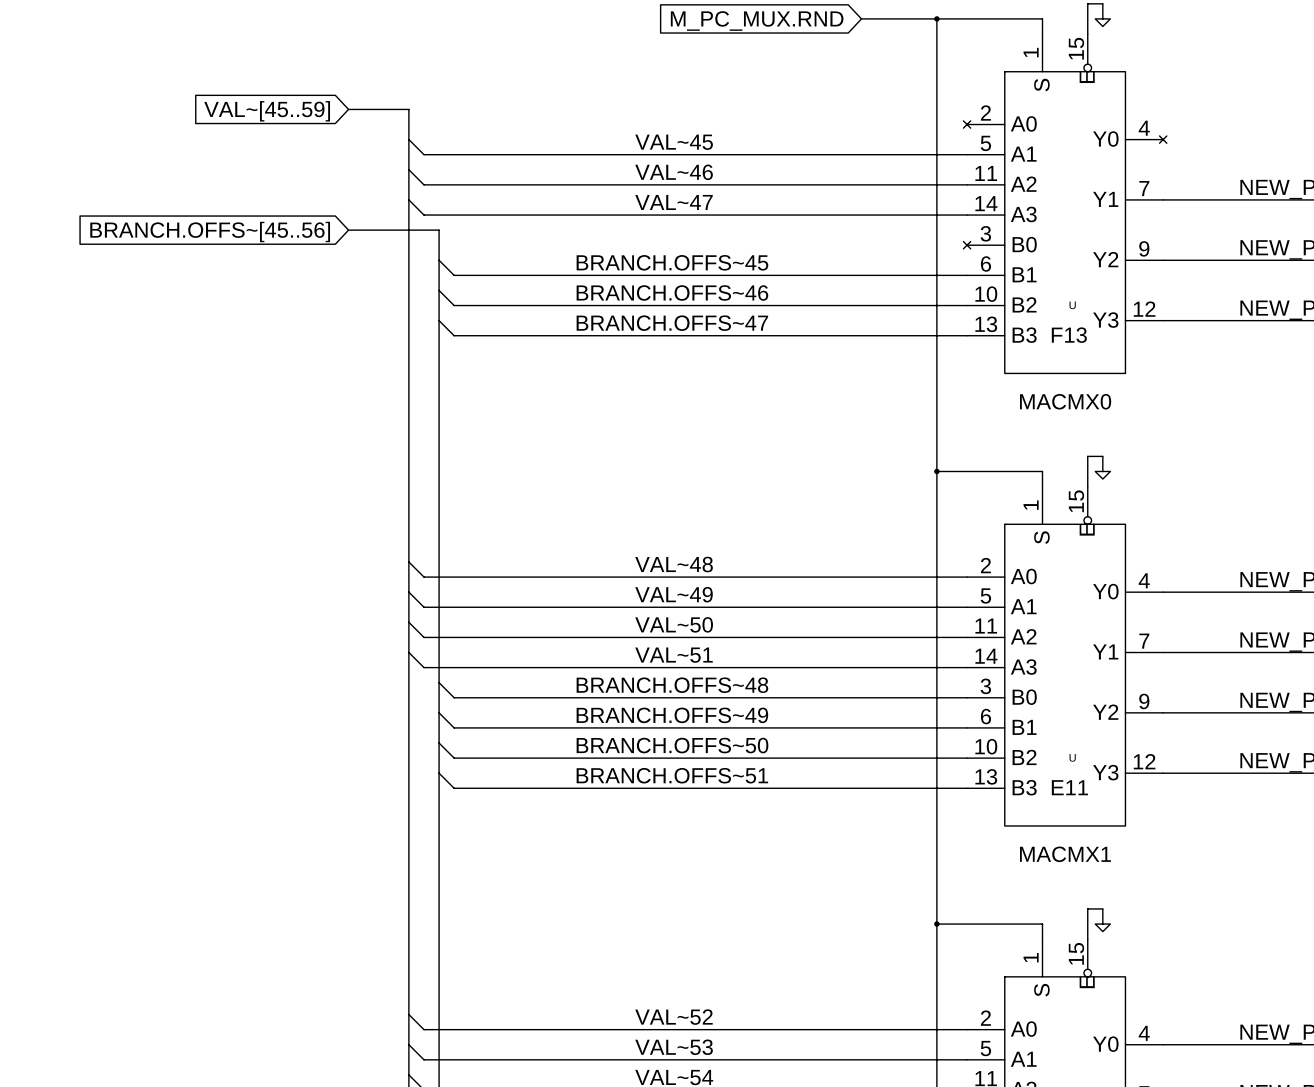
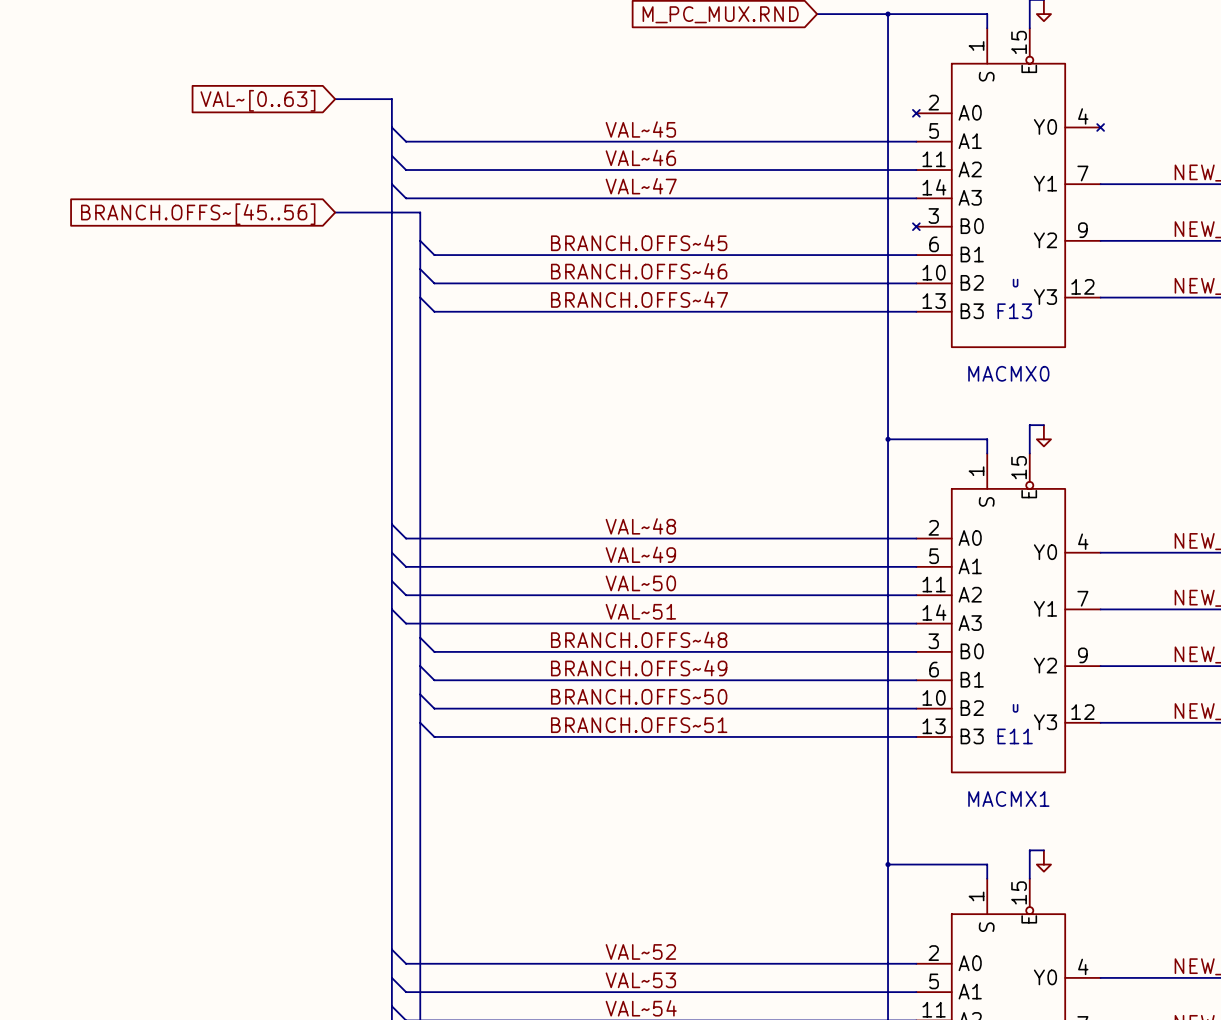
global label: VAL~[45..59] (267, 111) -> VAL~[0..63] (257, 100)

